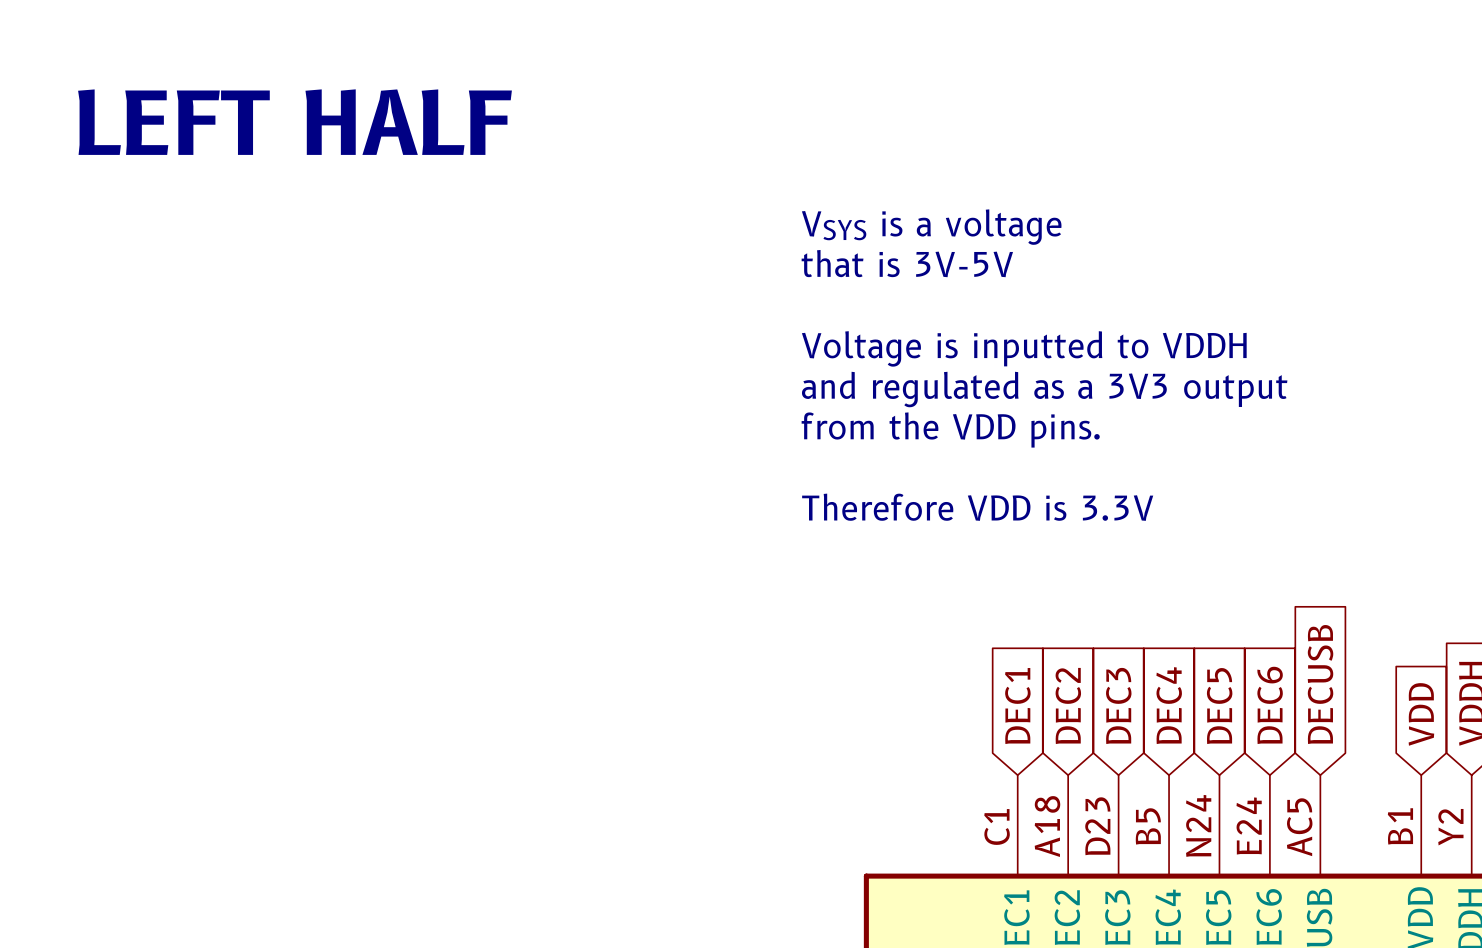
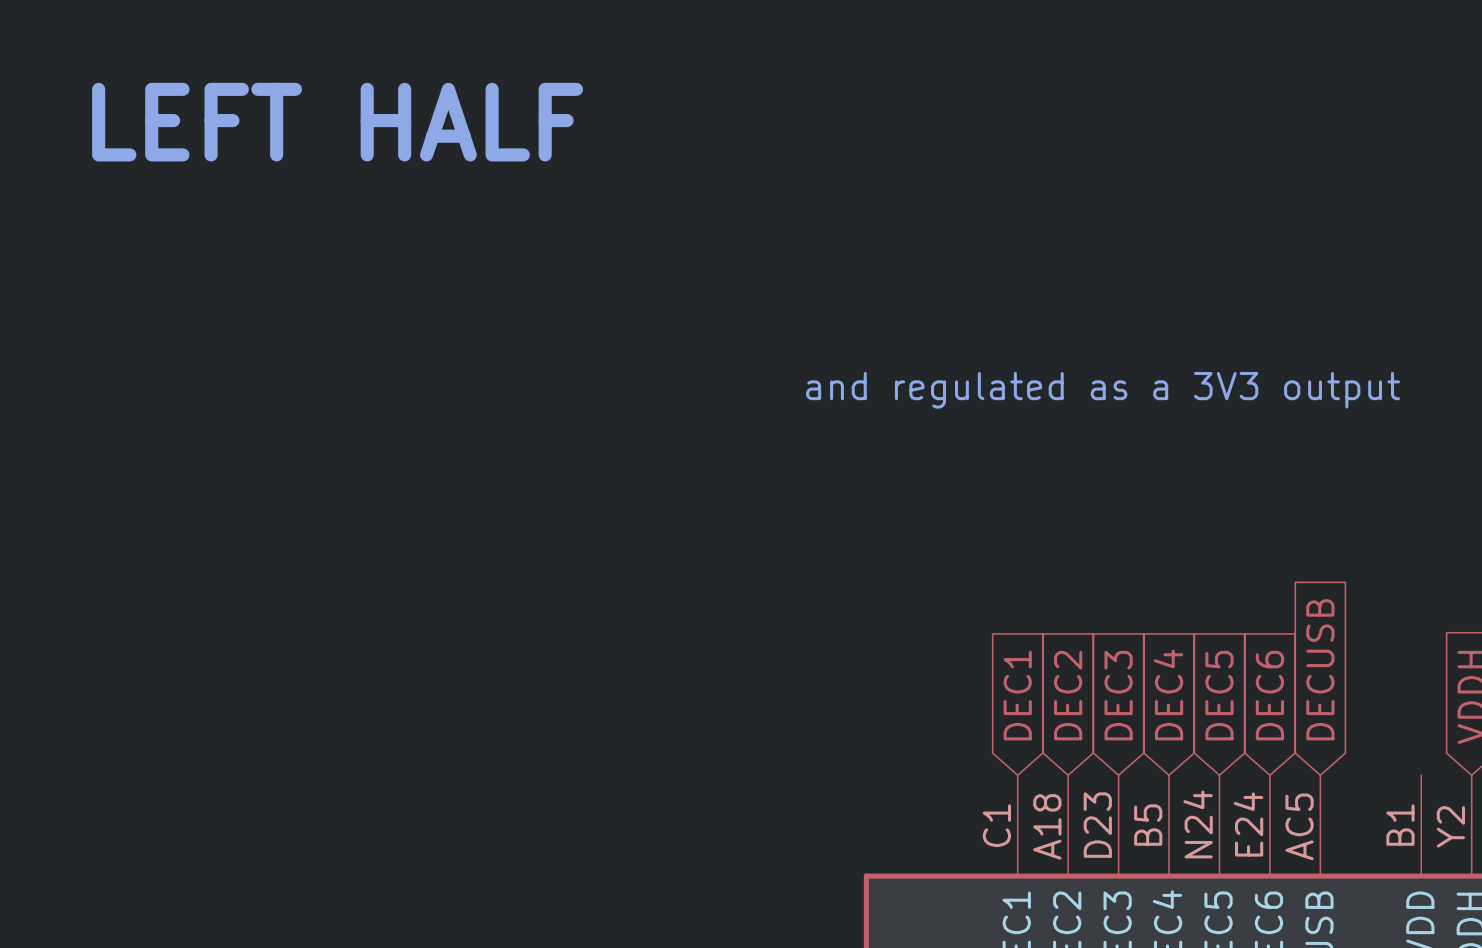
text: VSYS is a voltage (931, 227) -> none
text: that is 3V-5V (907, 263) -> none
text: Voltage is inputted to VDDH (1024, 348) -> none
text: from the VDD pins. (950, 429) -> none
text: Therefore VDD is 3.3V (977, 507) -> none
global label: VDD (1421, 714) -> none

